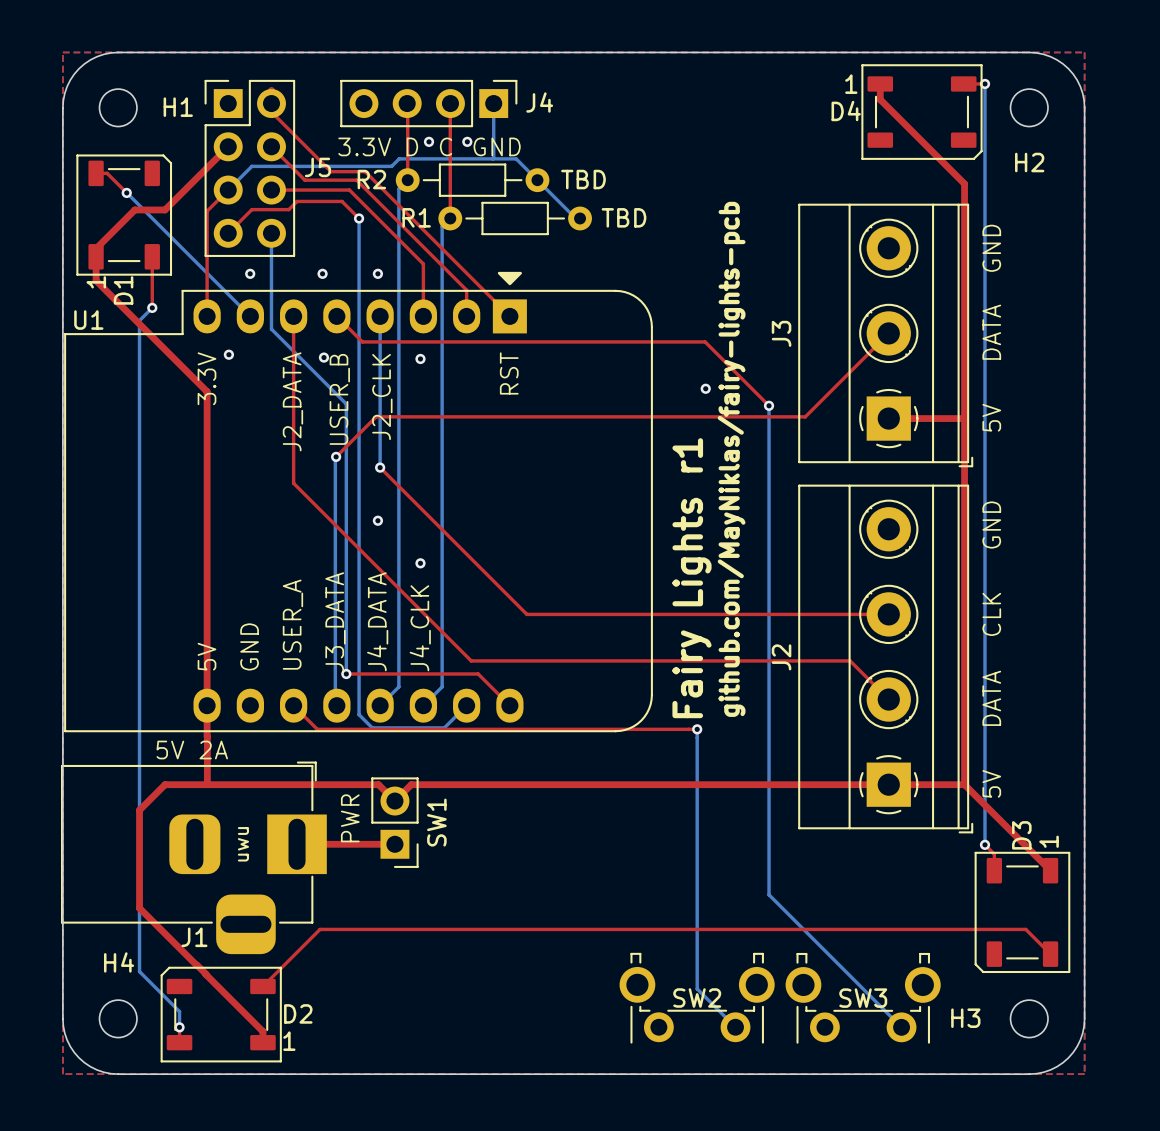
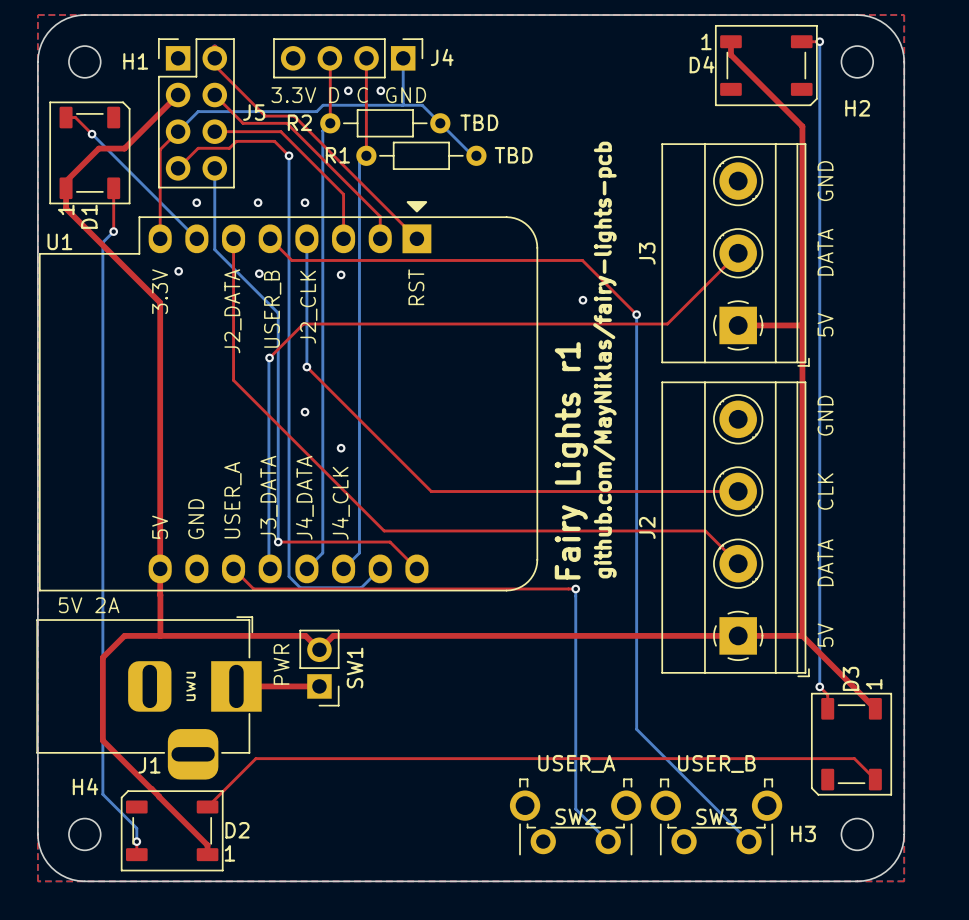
text position: 5V 2A (192, 749) -> 5V 2A (89, 605)
SW2 value: none -> USER_A (576, 763)
SW3 value: none -> USER_B (716, 763)

